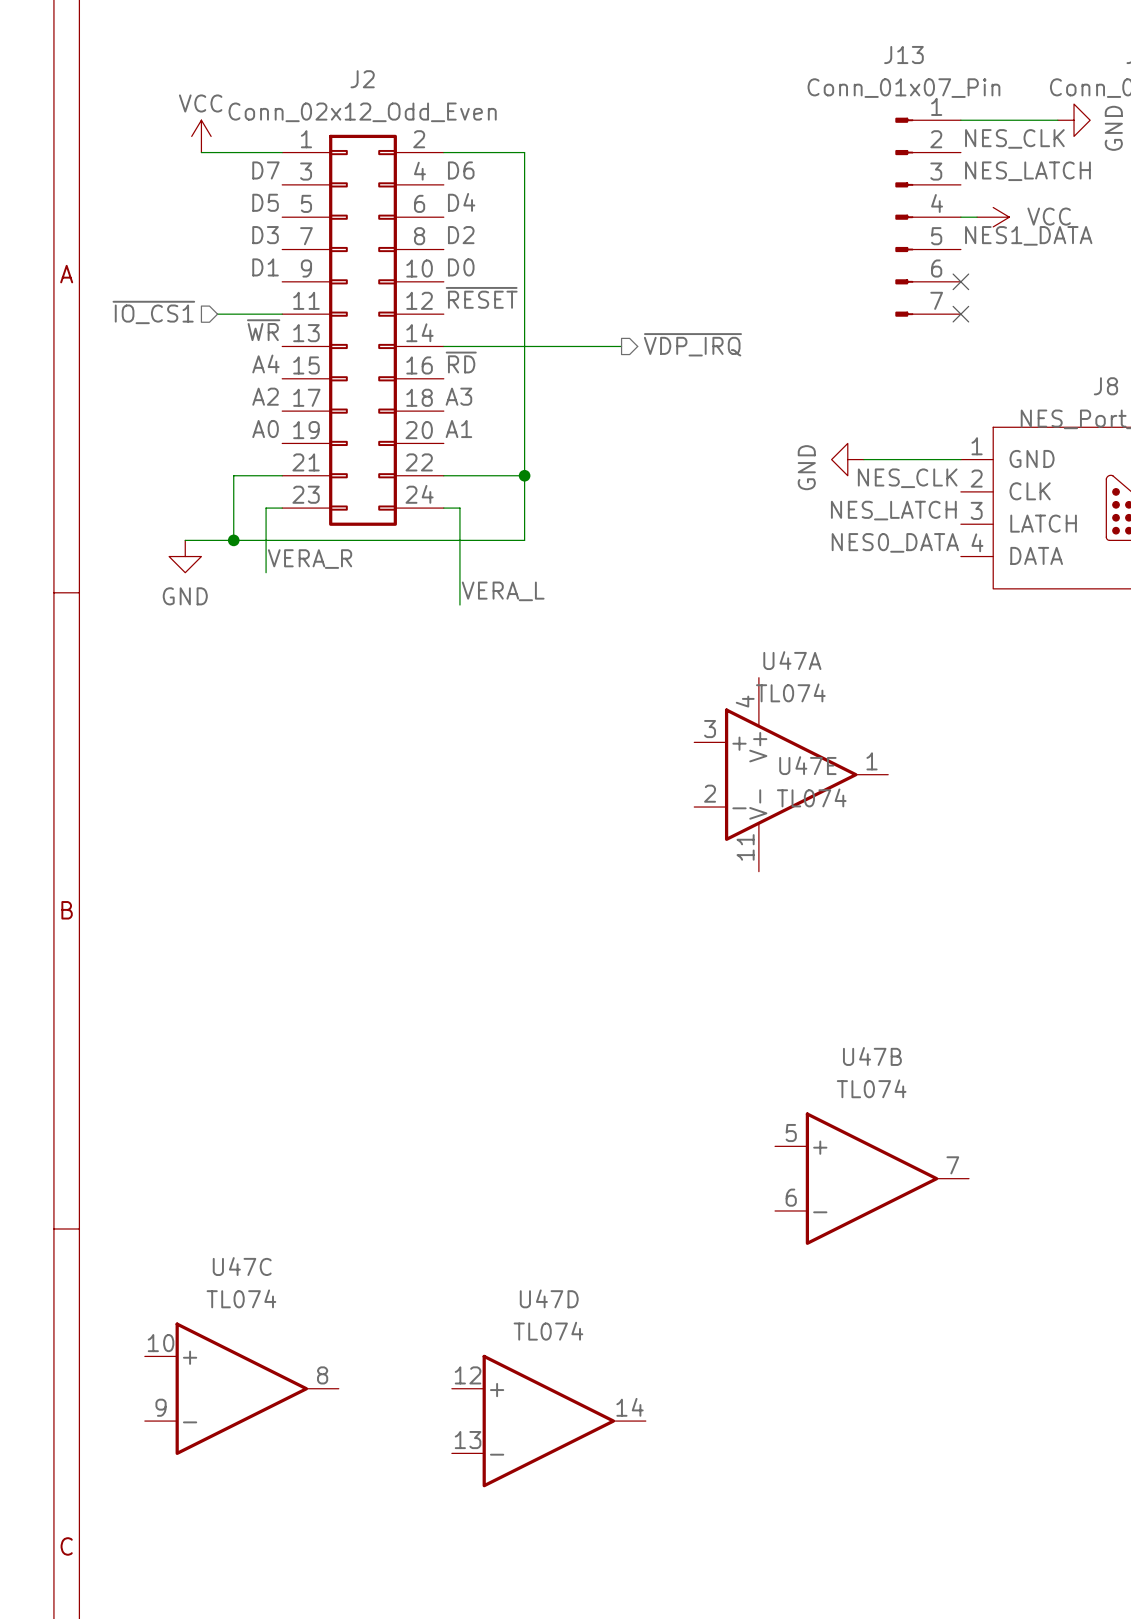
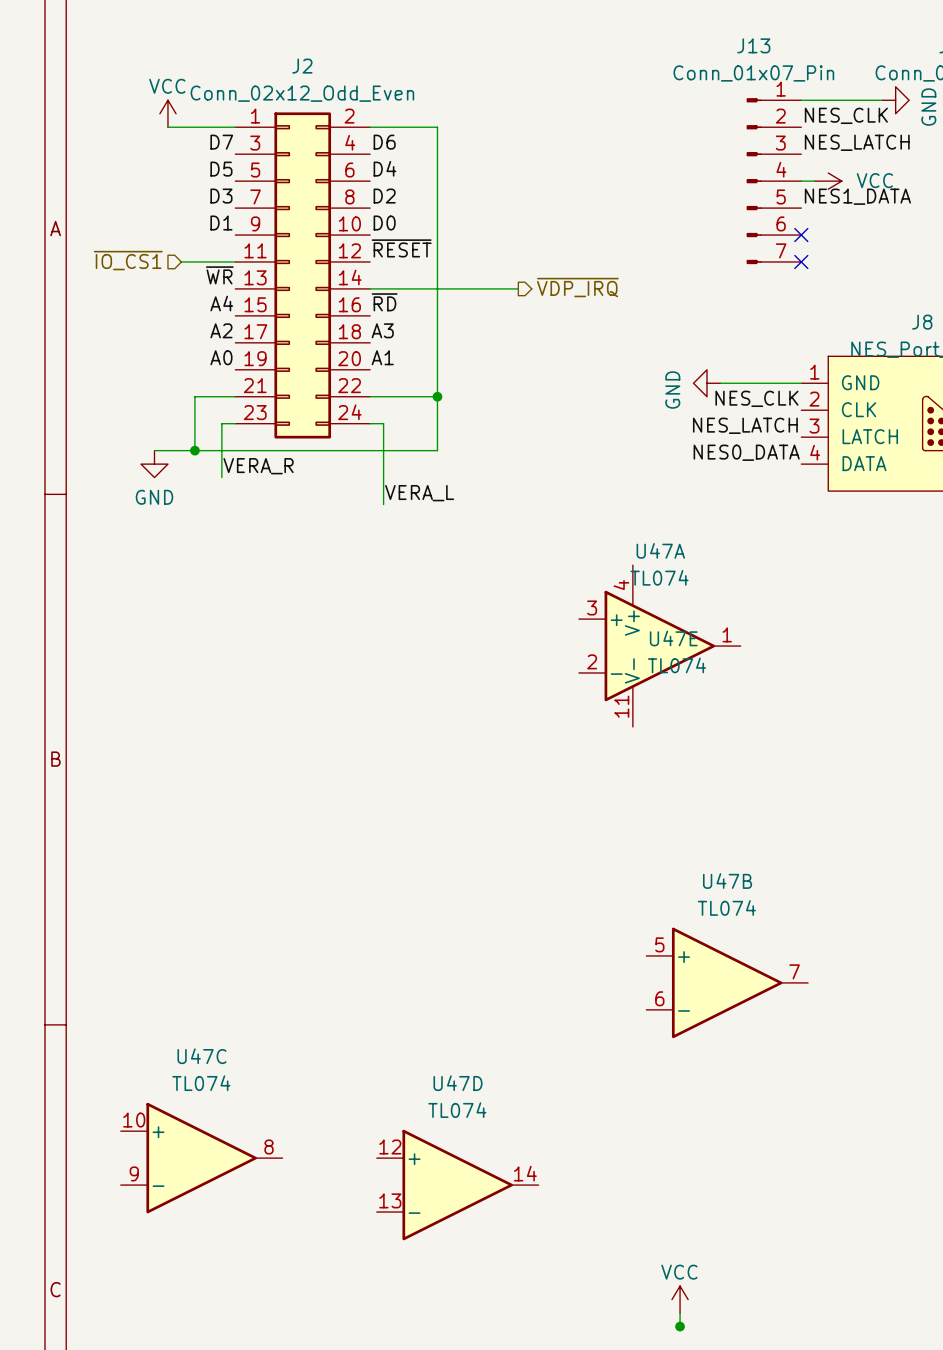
power symbol: none -> VCC (680, 1299)
wire: none -> (680, 1313) (680, 1326)
junction: none -> (680, 1326)

